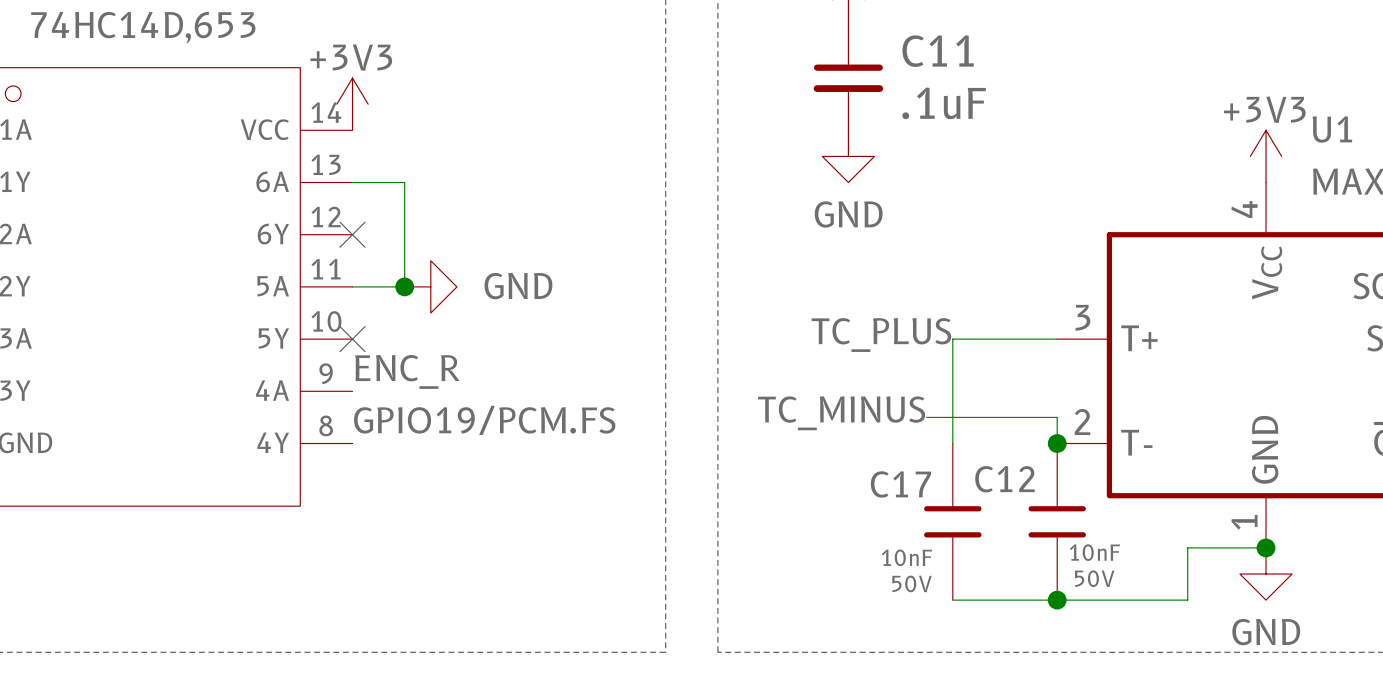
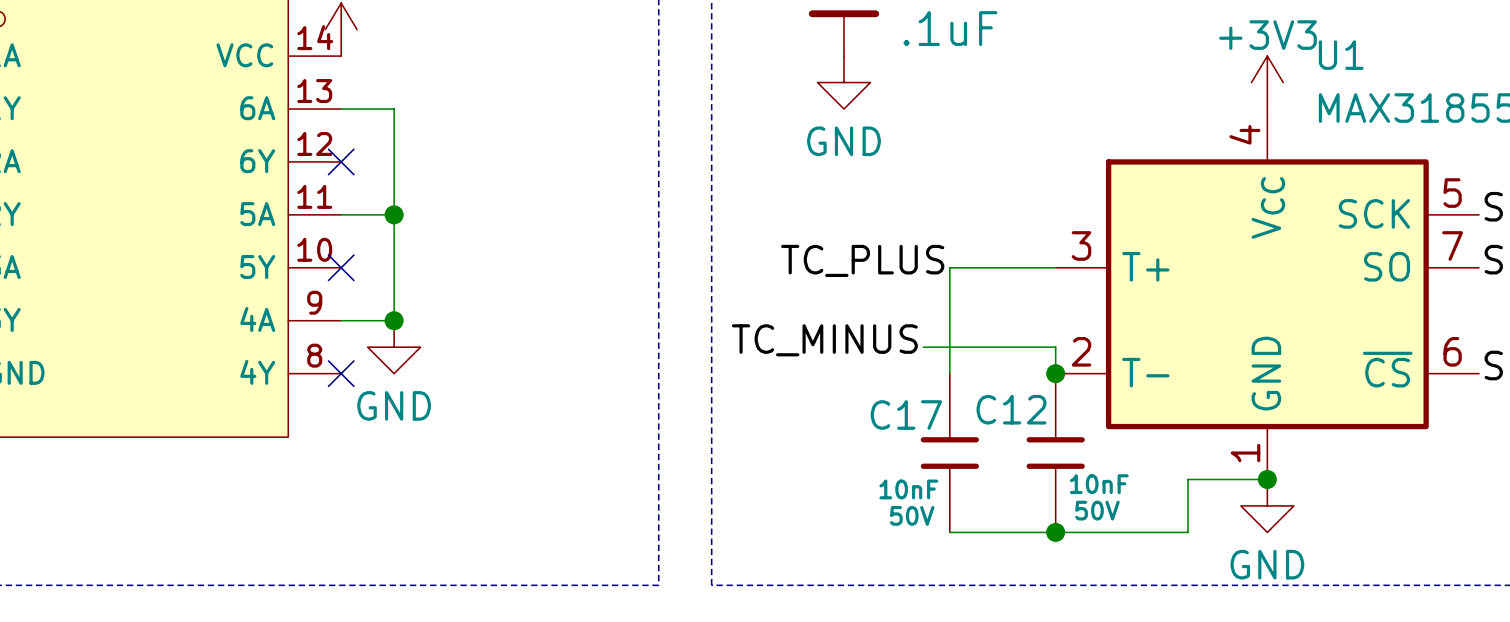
wire: none -> (394, 214) (394, 320) (341, 320)
power symbol rotation: 0° (430, 286) -> 90° clockwise (394, 347)
power symbol position: GND (430, 286) -> GND (394, 347)
power symbol text position: GND (518, 286) -> GND (394, 405)
label: ENC_R (407, 371) -> none
junction: none -> (394, 320)
label: GPIO19/PCM.FS (484, 420) -> none
no-connect mark: none -> (341, 373)

